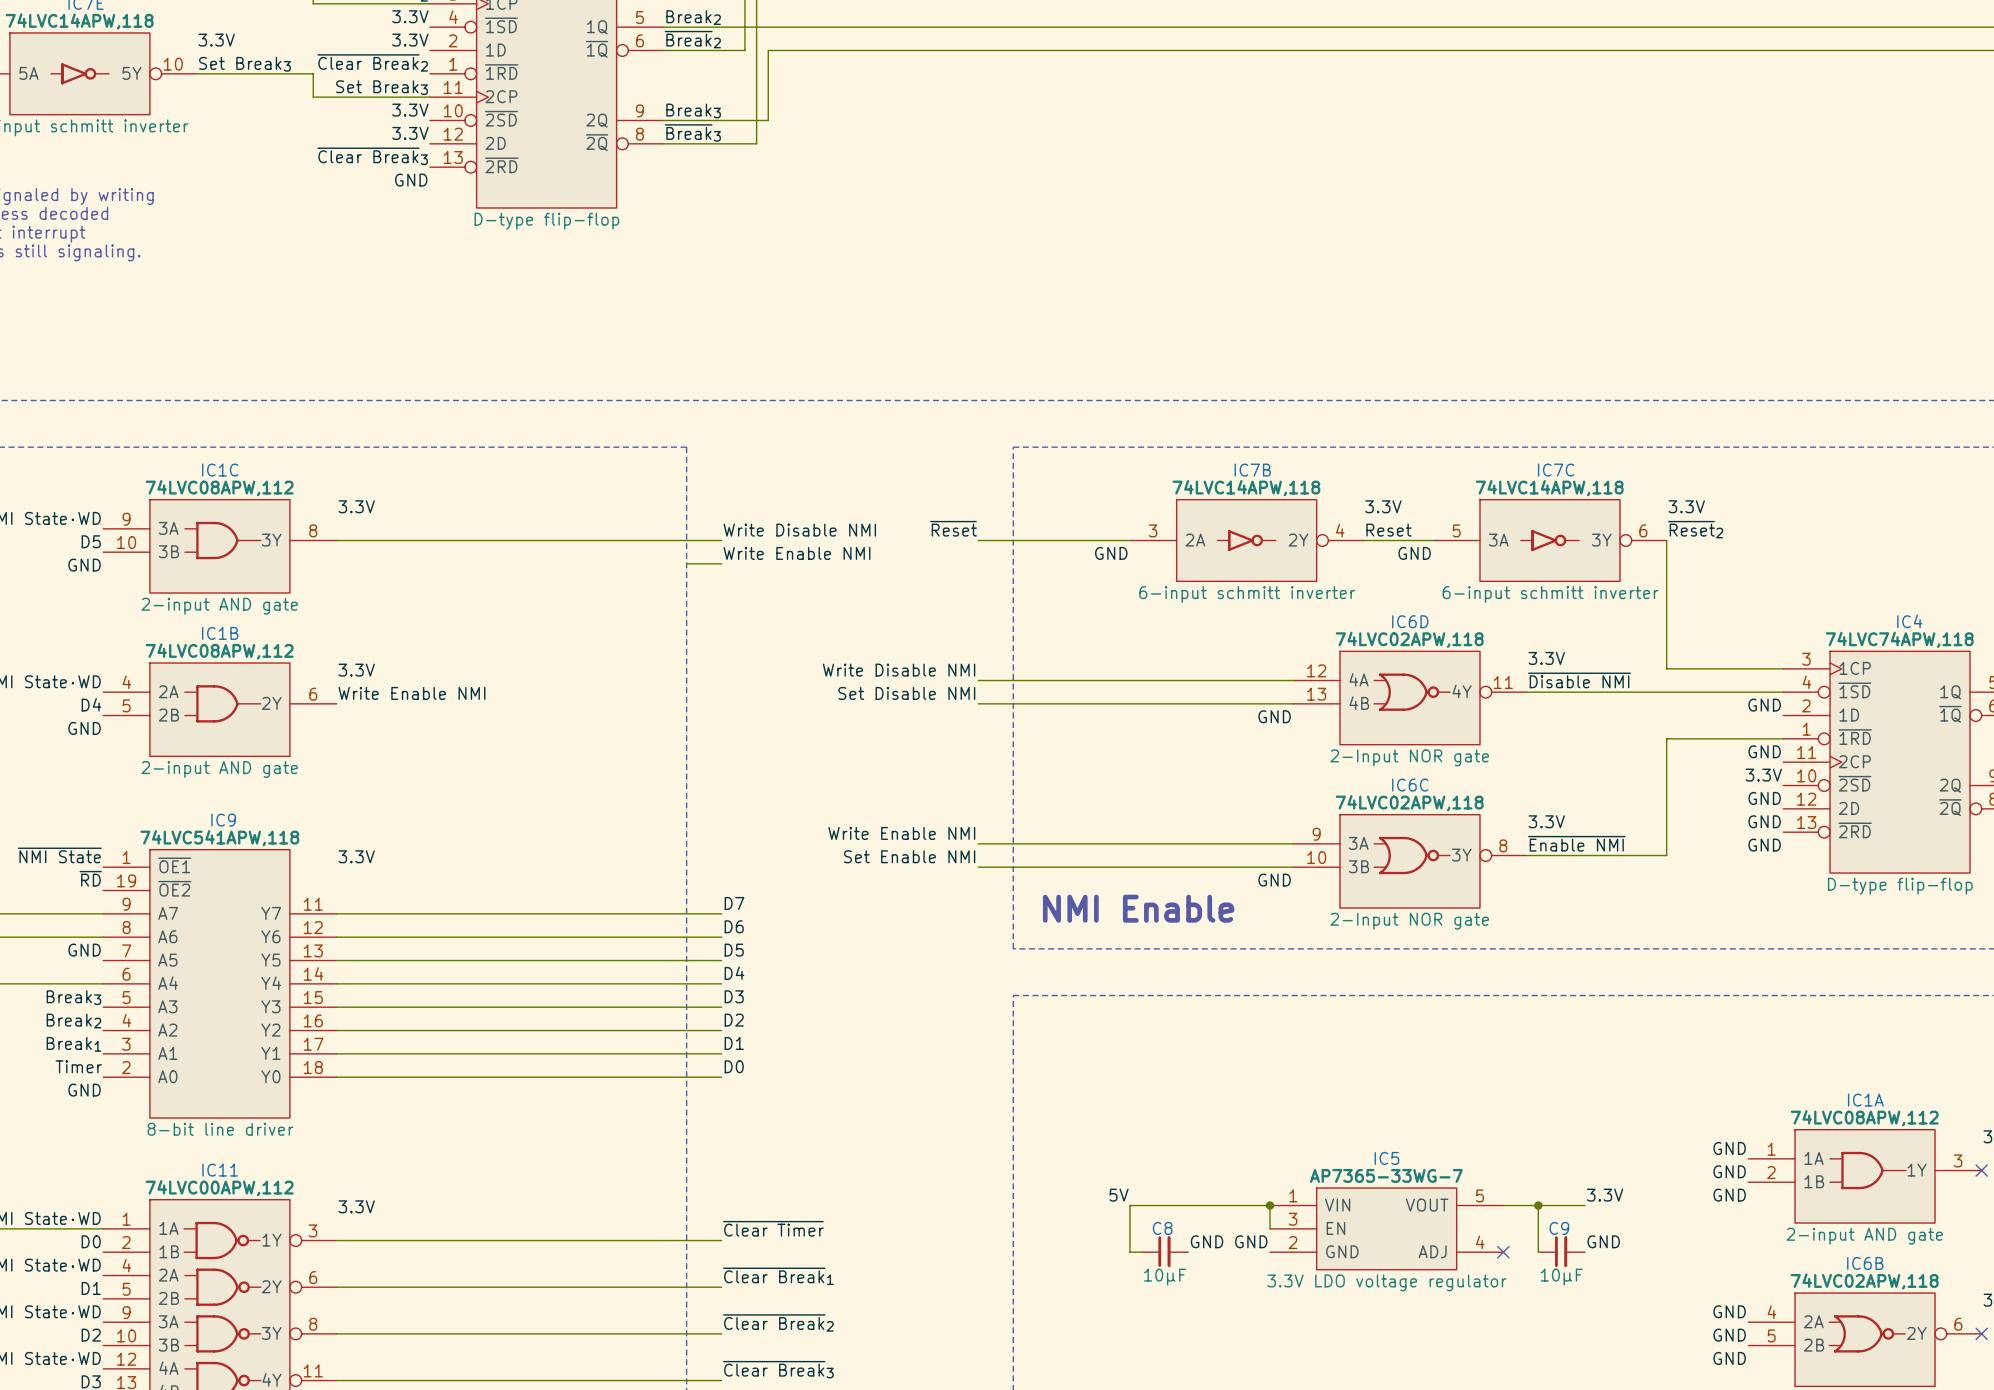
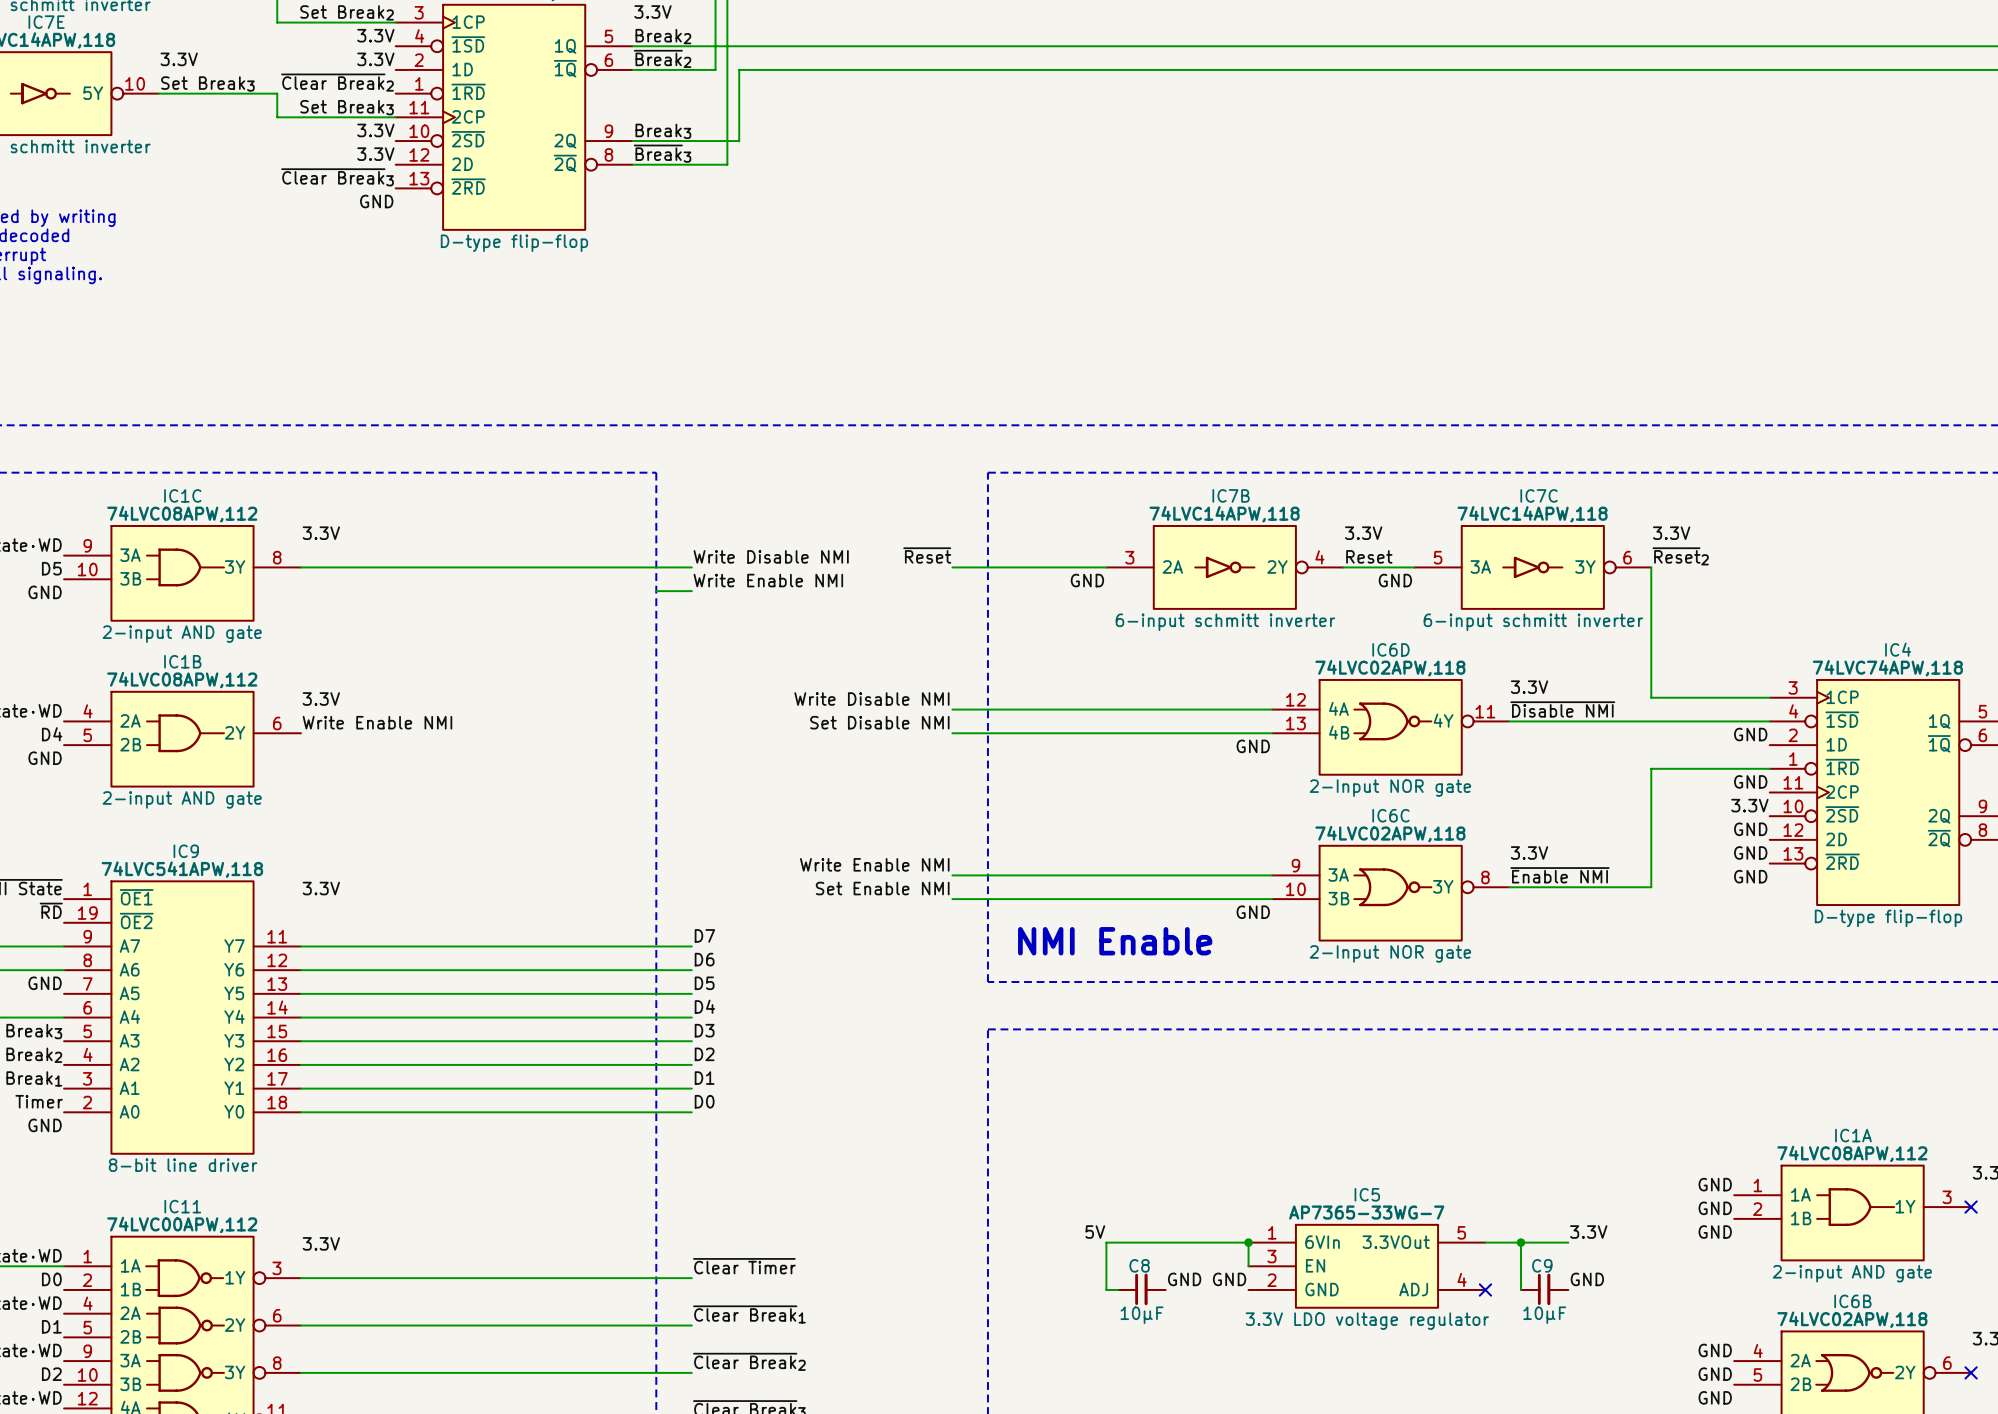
IC5 pin name: VIN (1337, 1205) -> 6VIn (1322, 1242)
IC5 pin name: VOUT (1427, 1205) -> 3.3VOut (1396, 1242)

